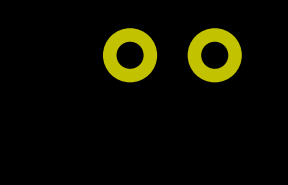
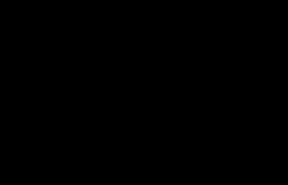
part: (172, 55) -> none

